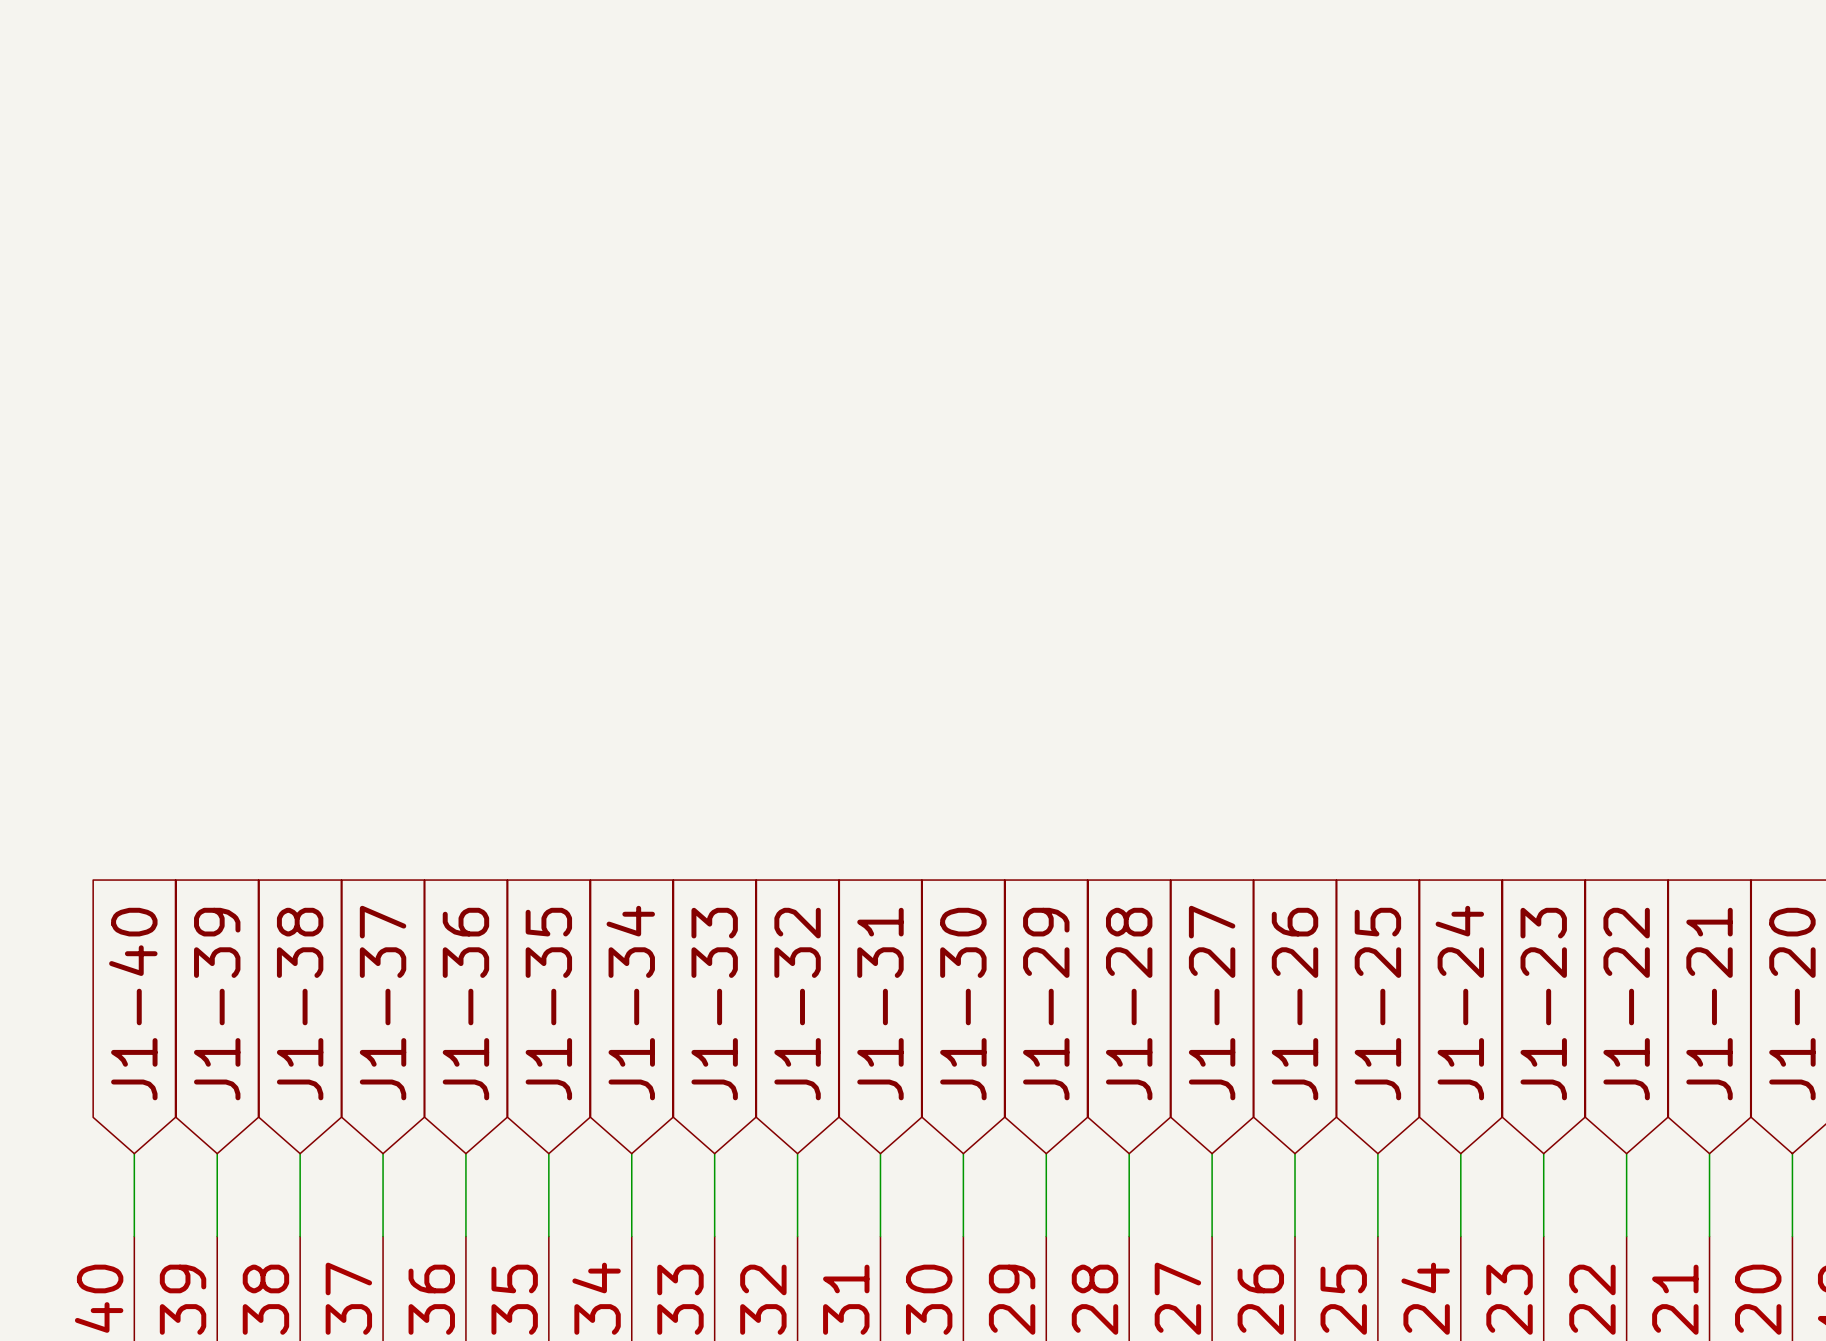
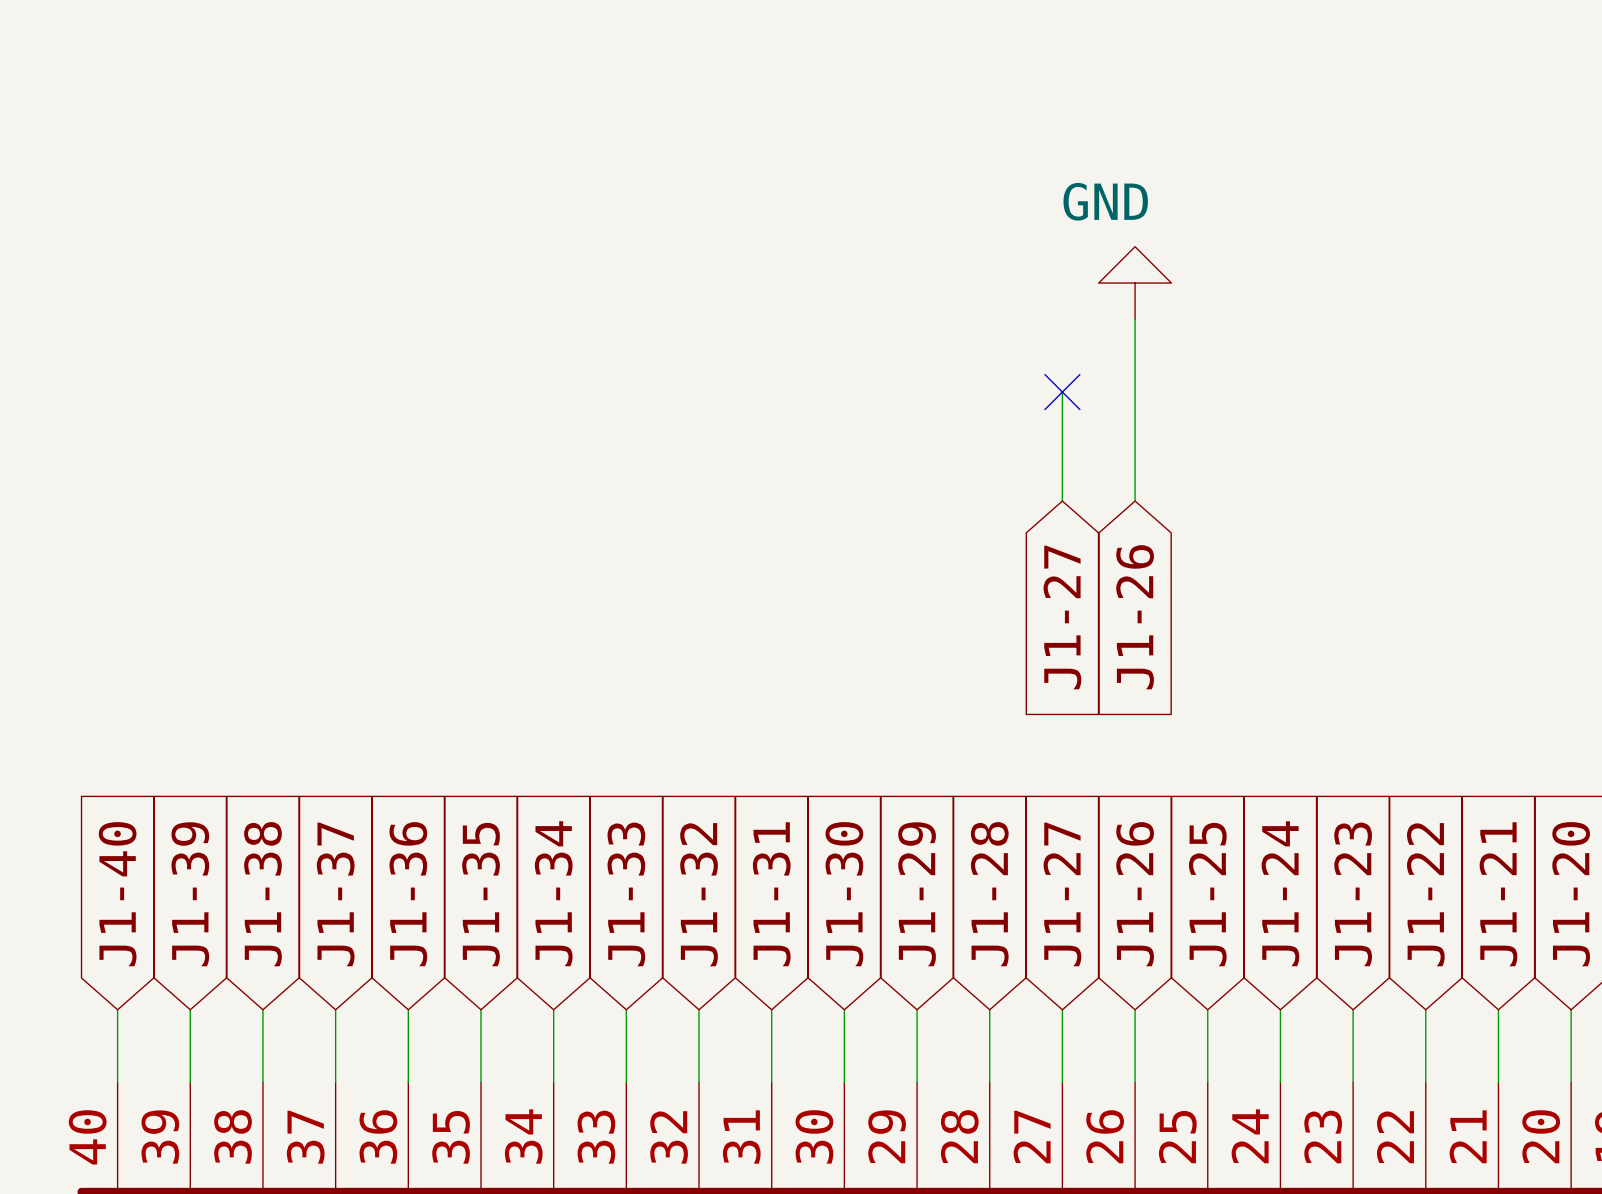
power symbol: none -> GND (1135, 283)
wire: none -> (1135, 319) (1135, 501)
wire: none -> (1062, 392) (1062, 501)
no-connect mark: none -> (1062, 392)
global label: none -> J1-27 (1062, 617)
global label: none -> J1-26 (1135, 617)

